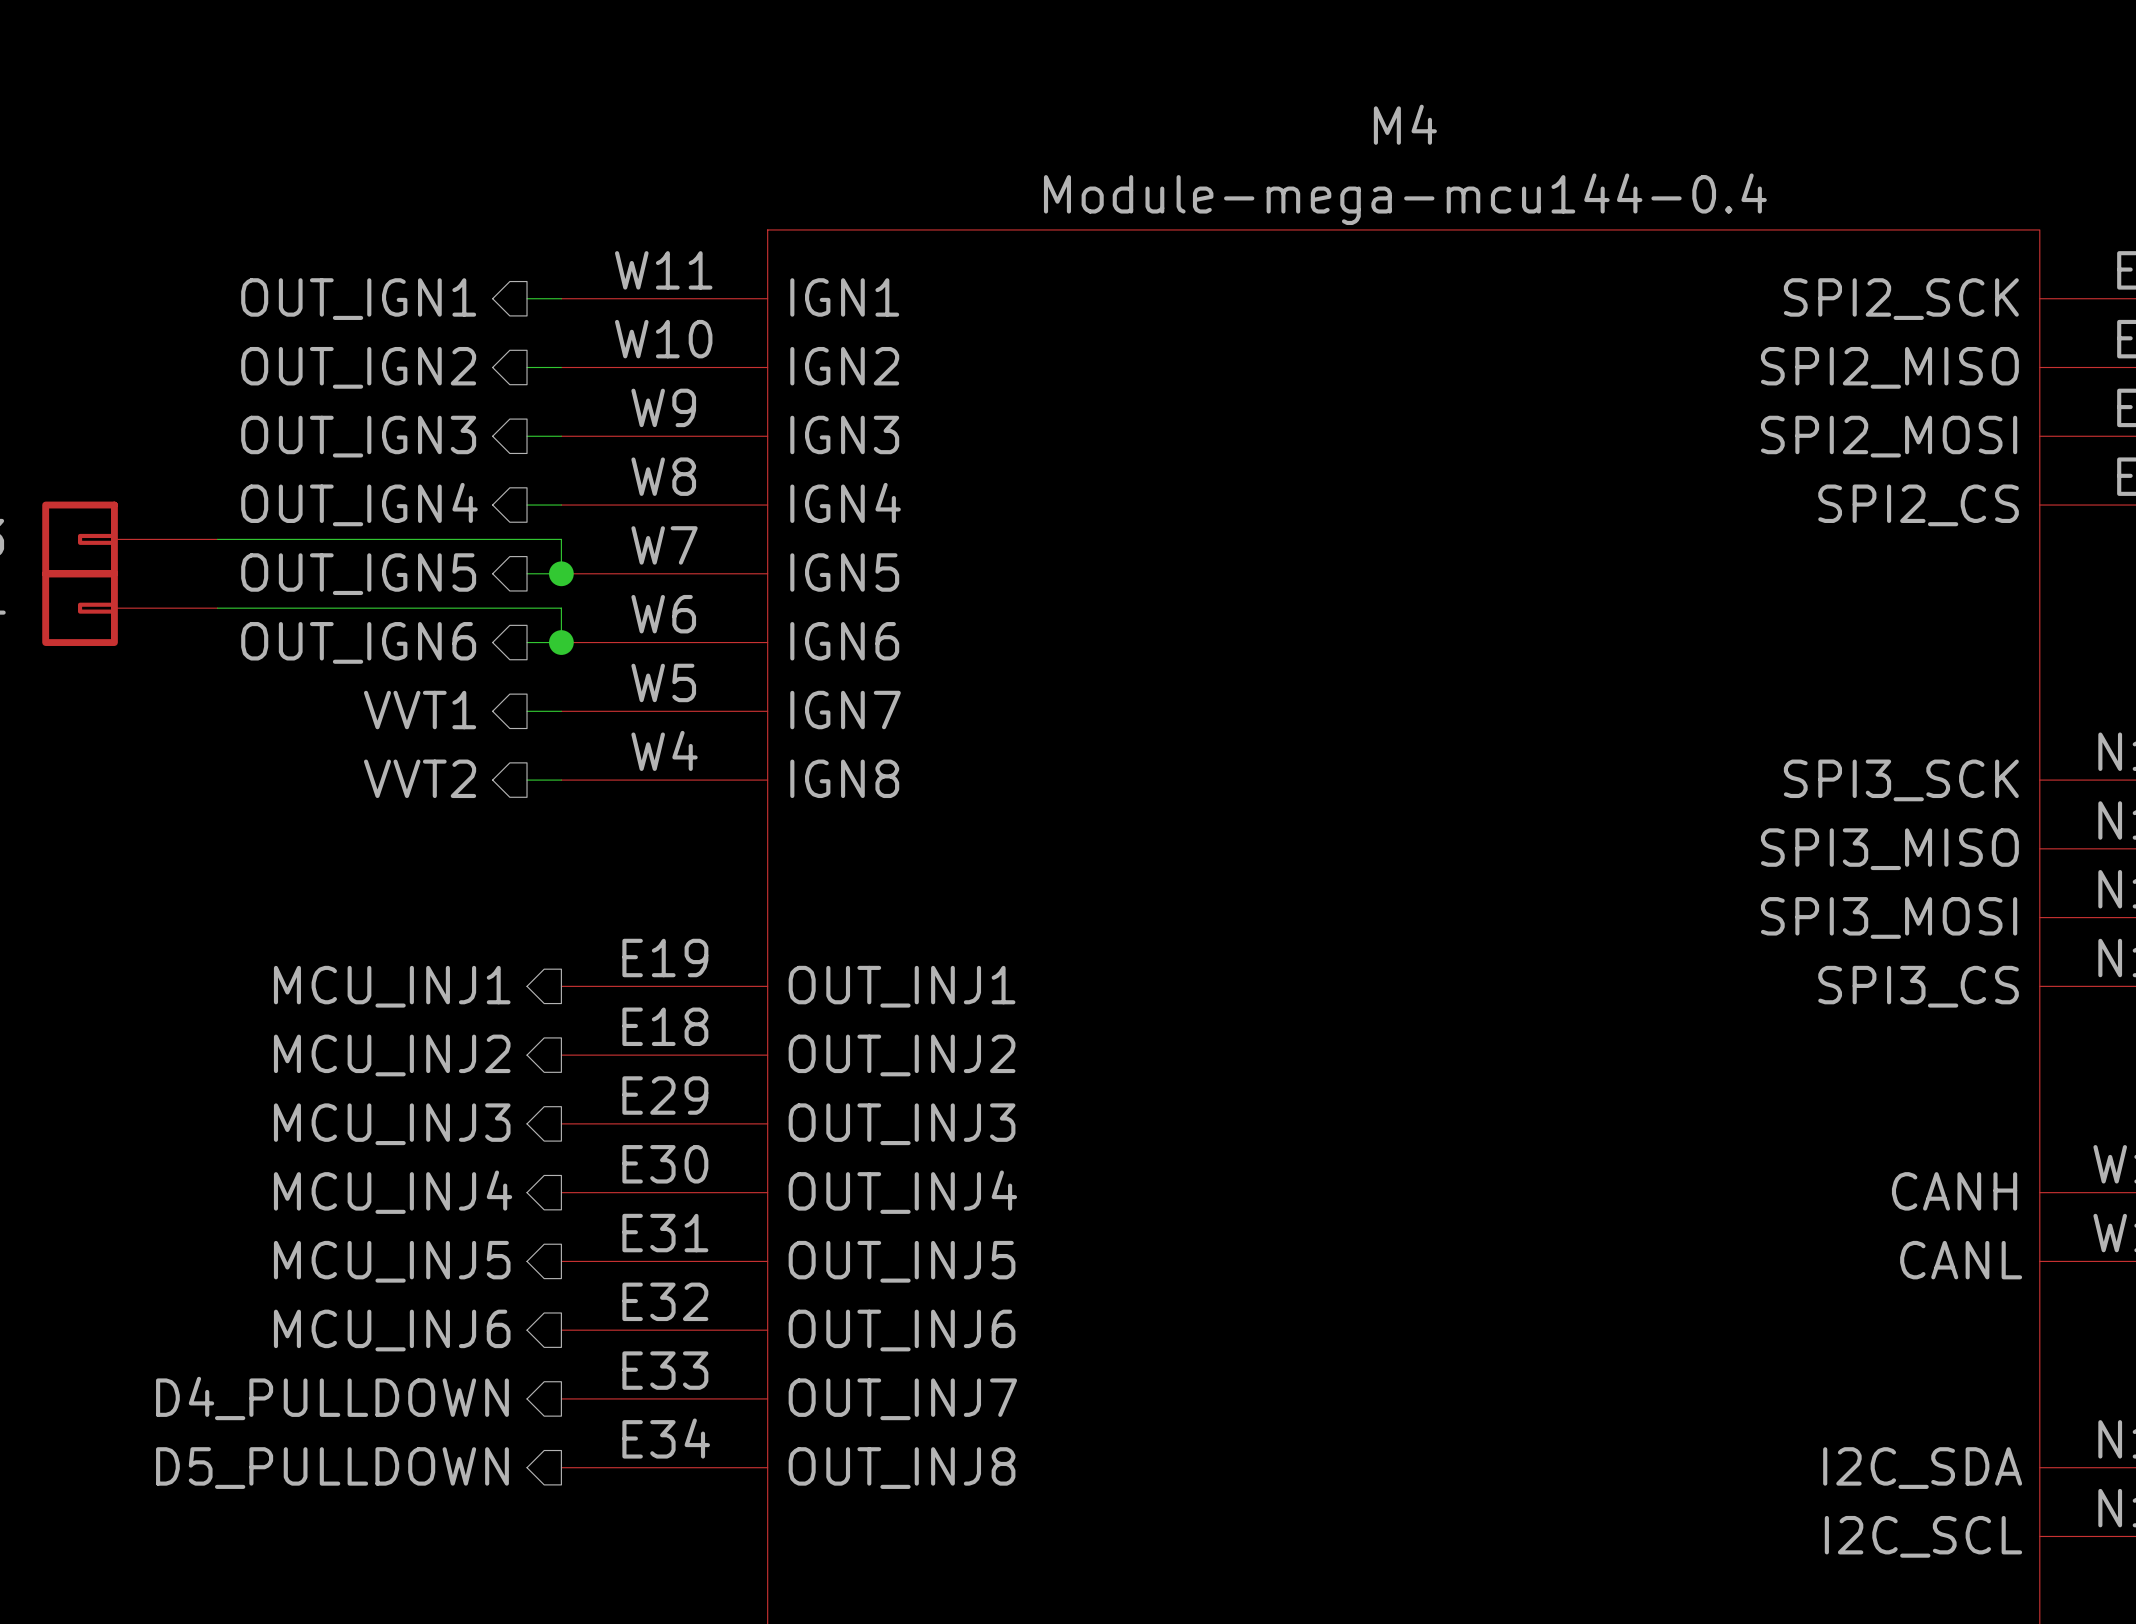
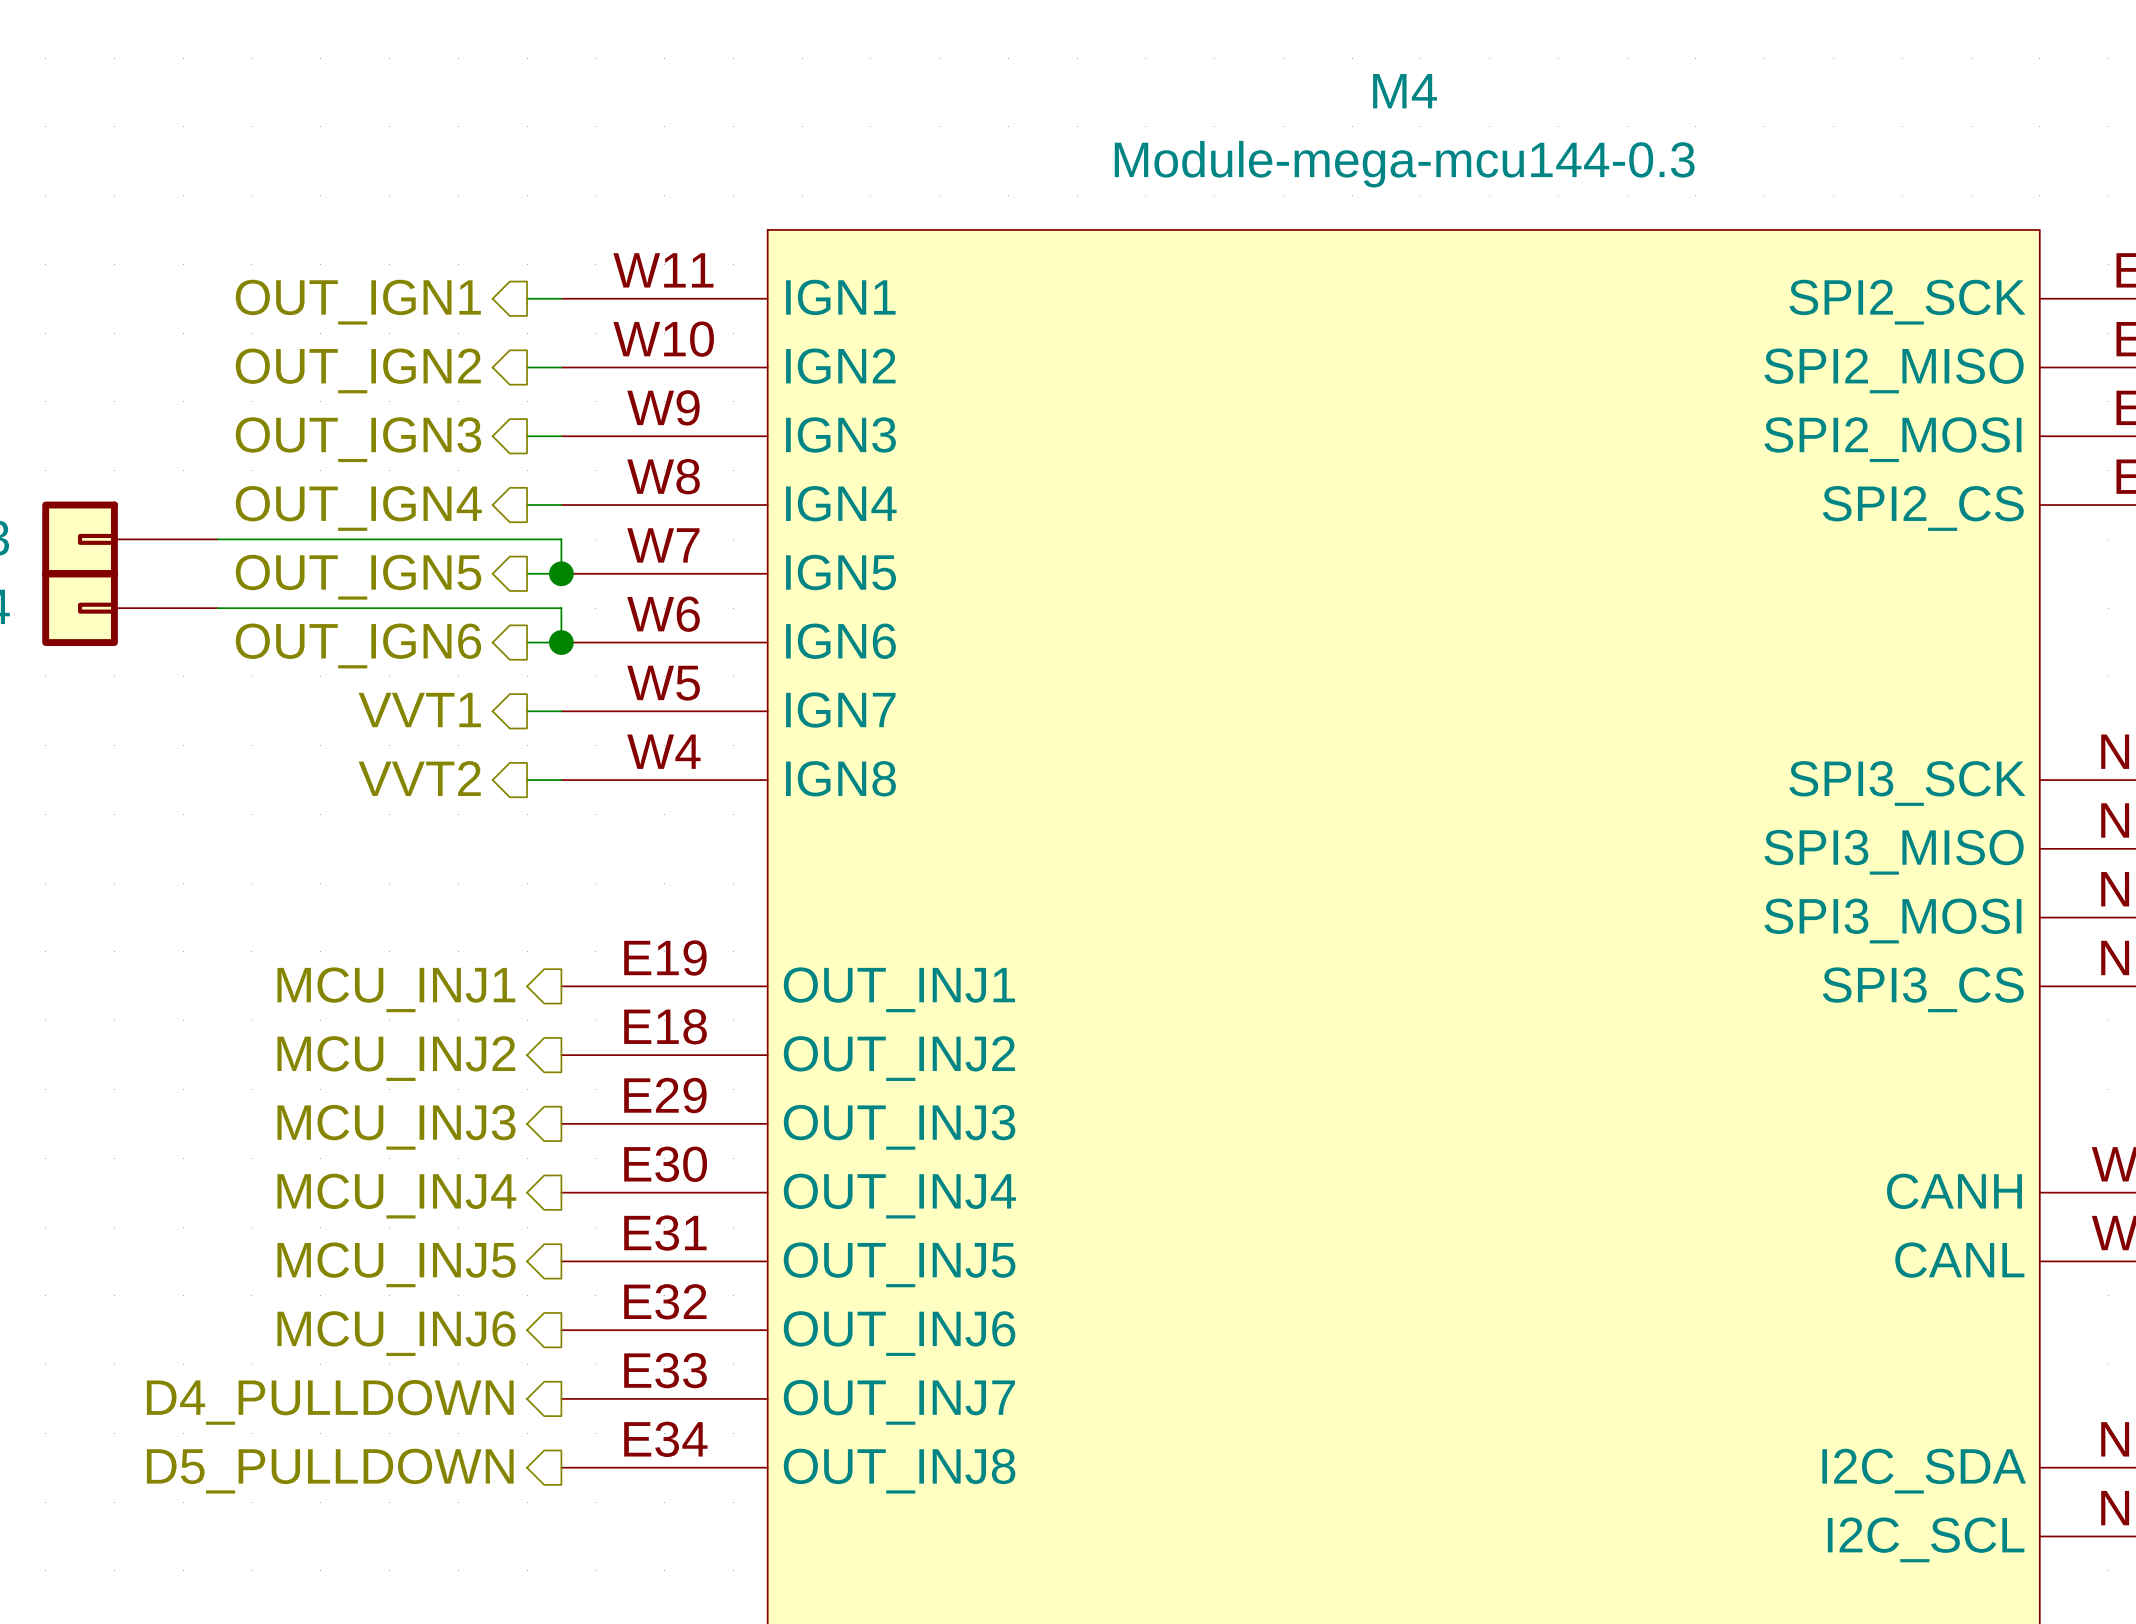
M4 name position: M4 (1405, 124) -> M4 (1405, 91)
M4 value: Module-mega-mcu144-0.4 (1405, 199) -> Module-mega-mcu144-0.3 (1404, 164)

